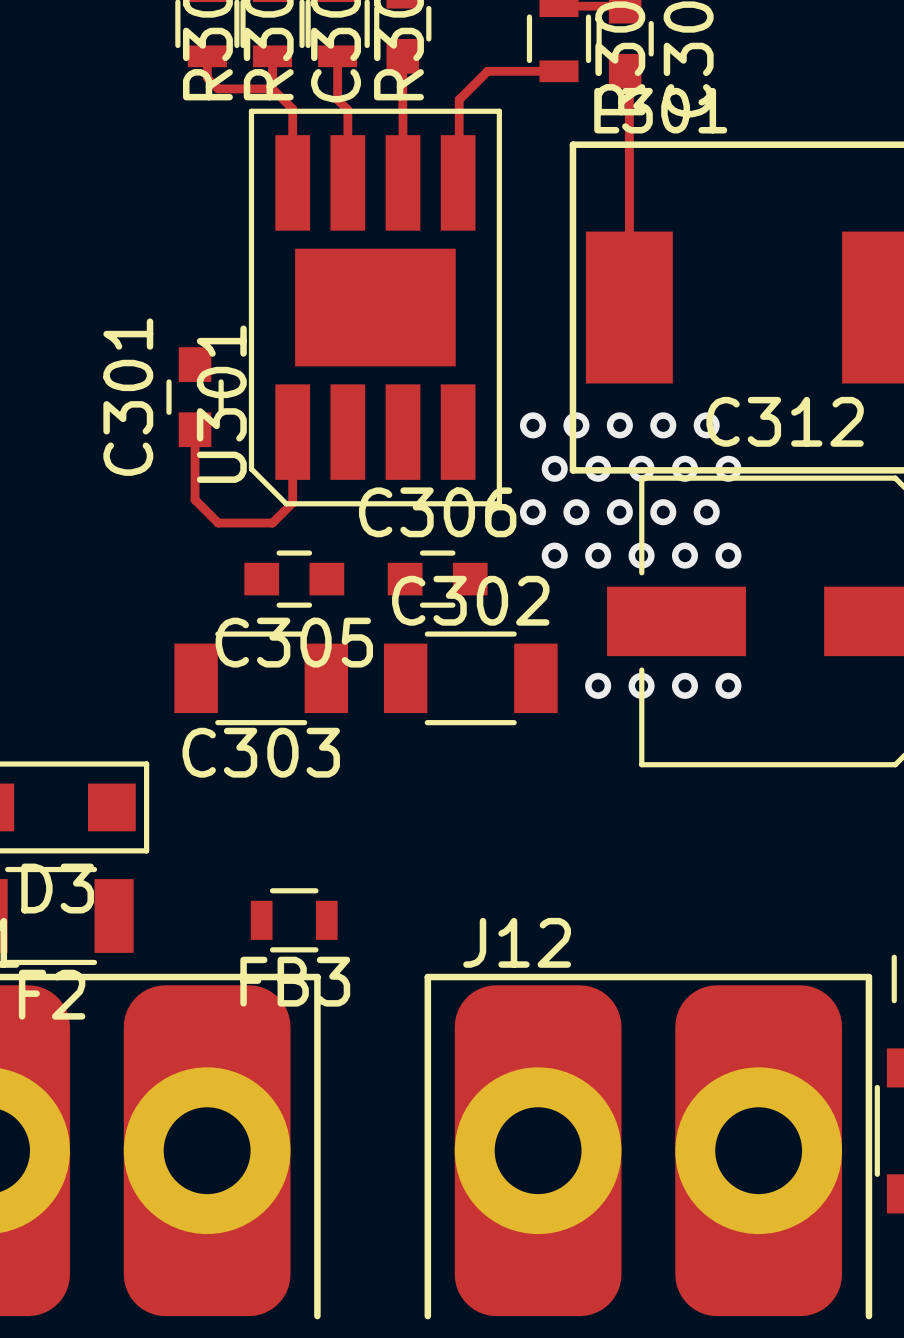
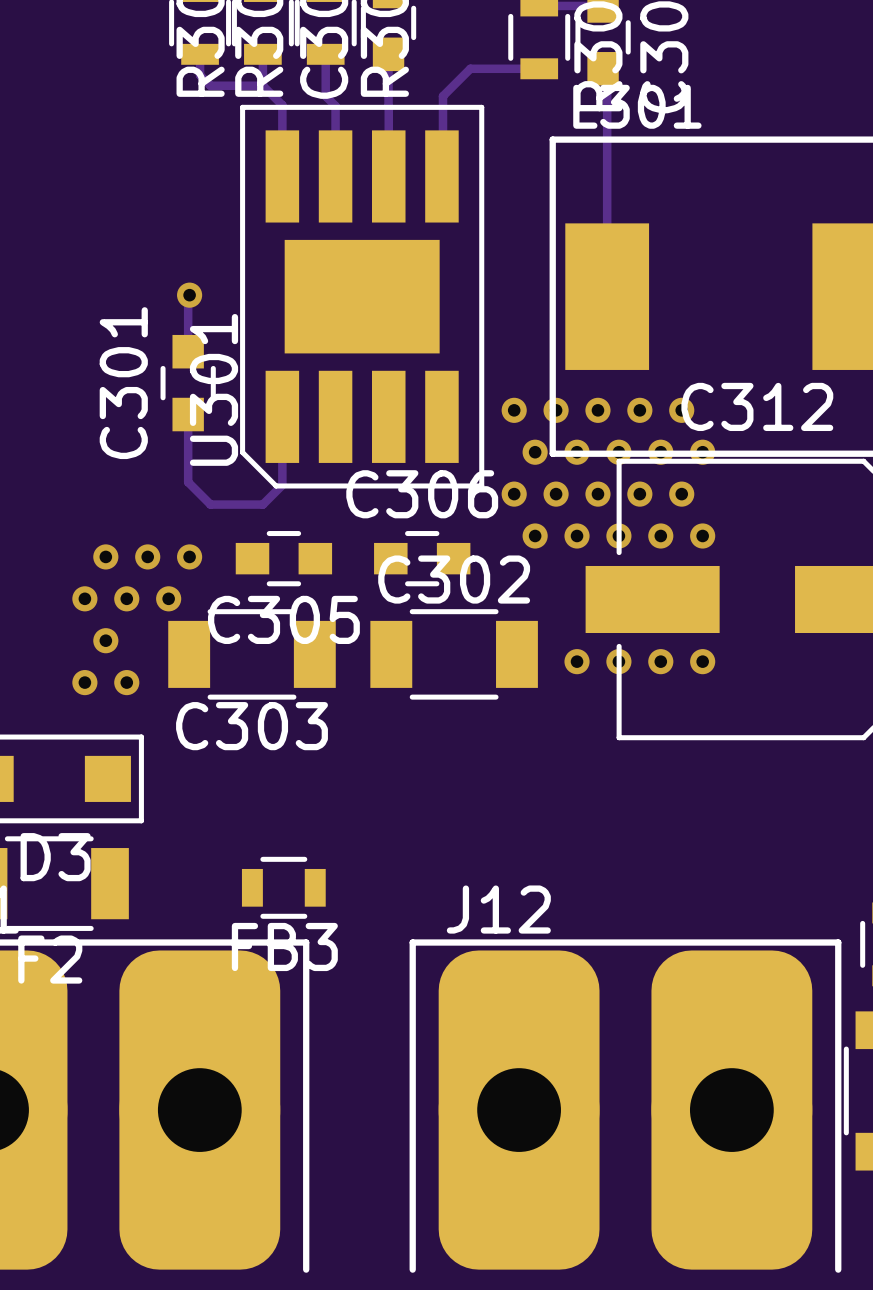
track: none -> (189, 295) (188, 351)
via: none -> (189, 295)
via: none -> (105, 556)
via: none -> (147, 556)
via: none -> (189, 556)
via: none -> (84, 598)
via: none -> (126, 598)
via: none -> (168, 598)
via: none -> (105, 640)
via: none -> (84, 682)
via: none -> (126, 682)

